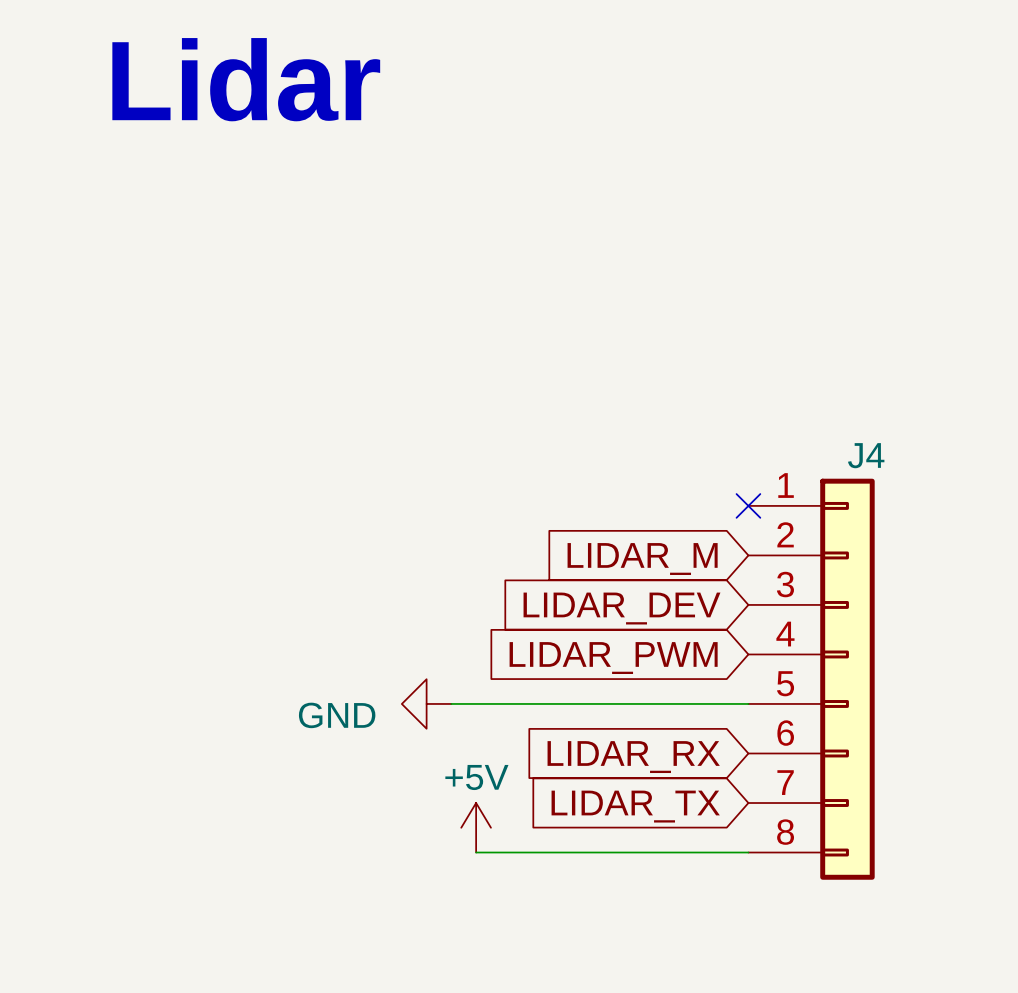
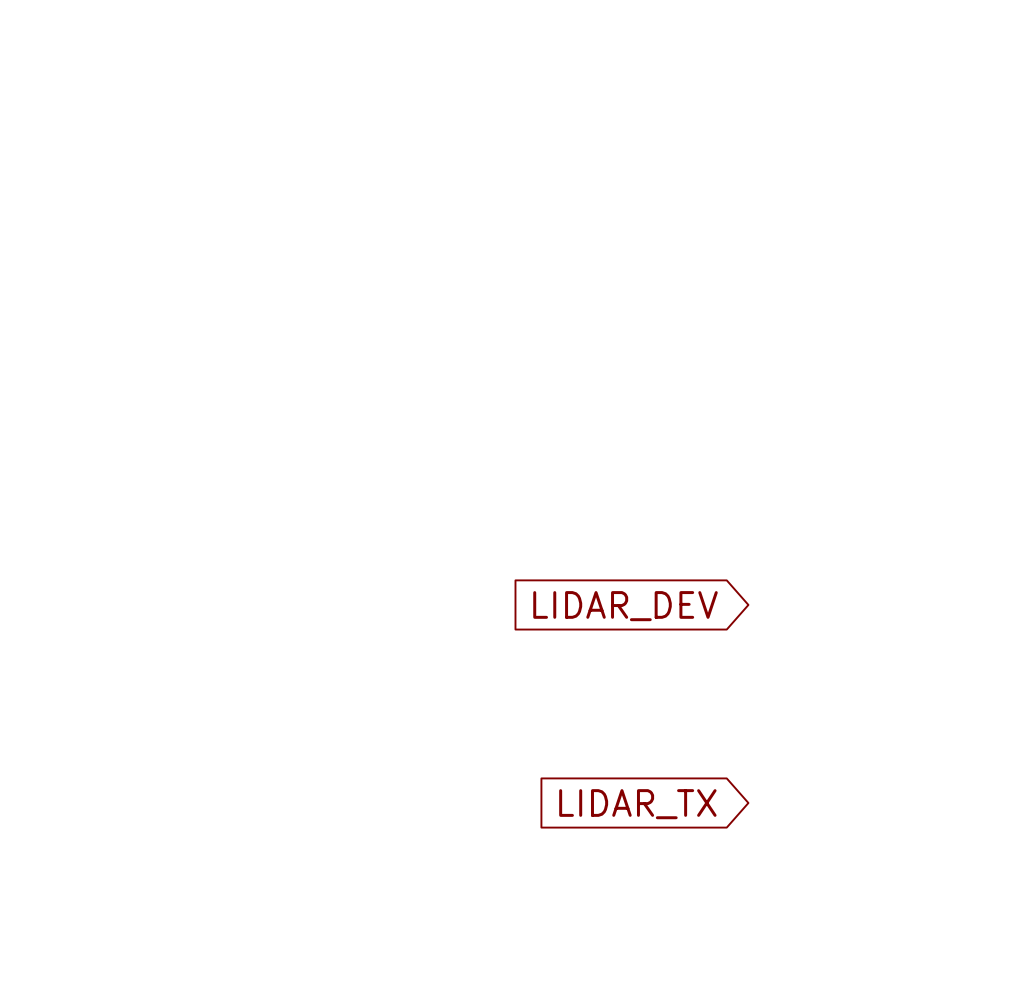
text: Lidar (246, 79) -> none
no-connect mark: (748, 505) -> none
global label: LIDAR_M (642, 559) -> none
global label: LIDAR_PWM (613, 658) -> none
J4: (811, 679) -> none
power symbol: GND (426, 703) -> none
wire: (451, 703) (748, 703) -> none
global label: LIDAR_RX (633, 757) -> none
power symbol: +5V (476, 827) -> none
wire: (476, 852) (748, 852) -> none

